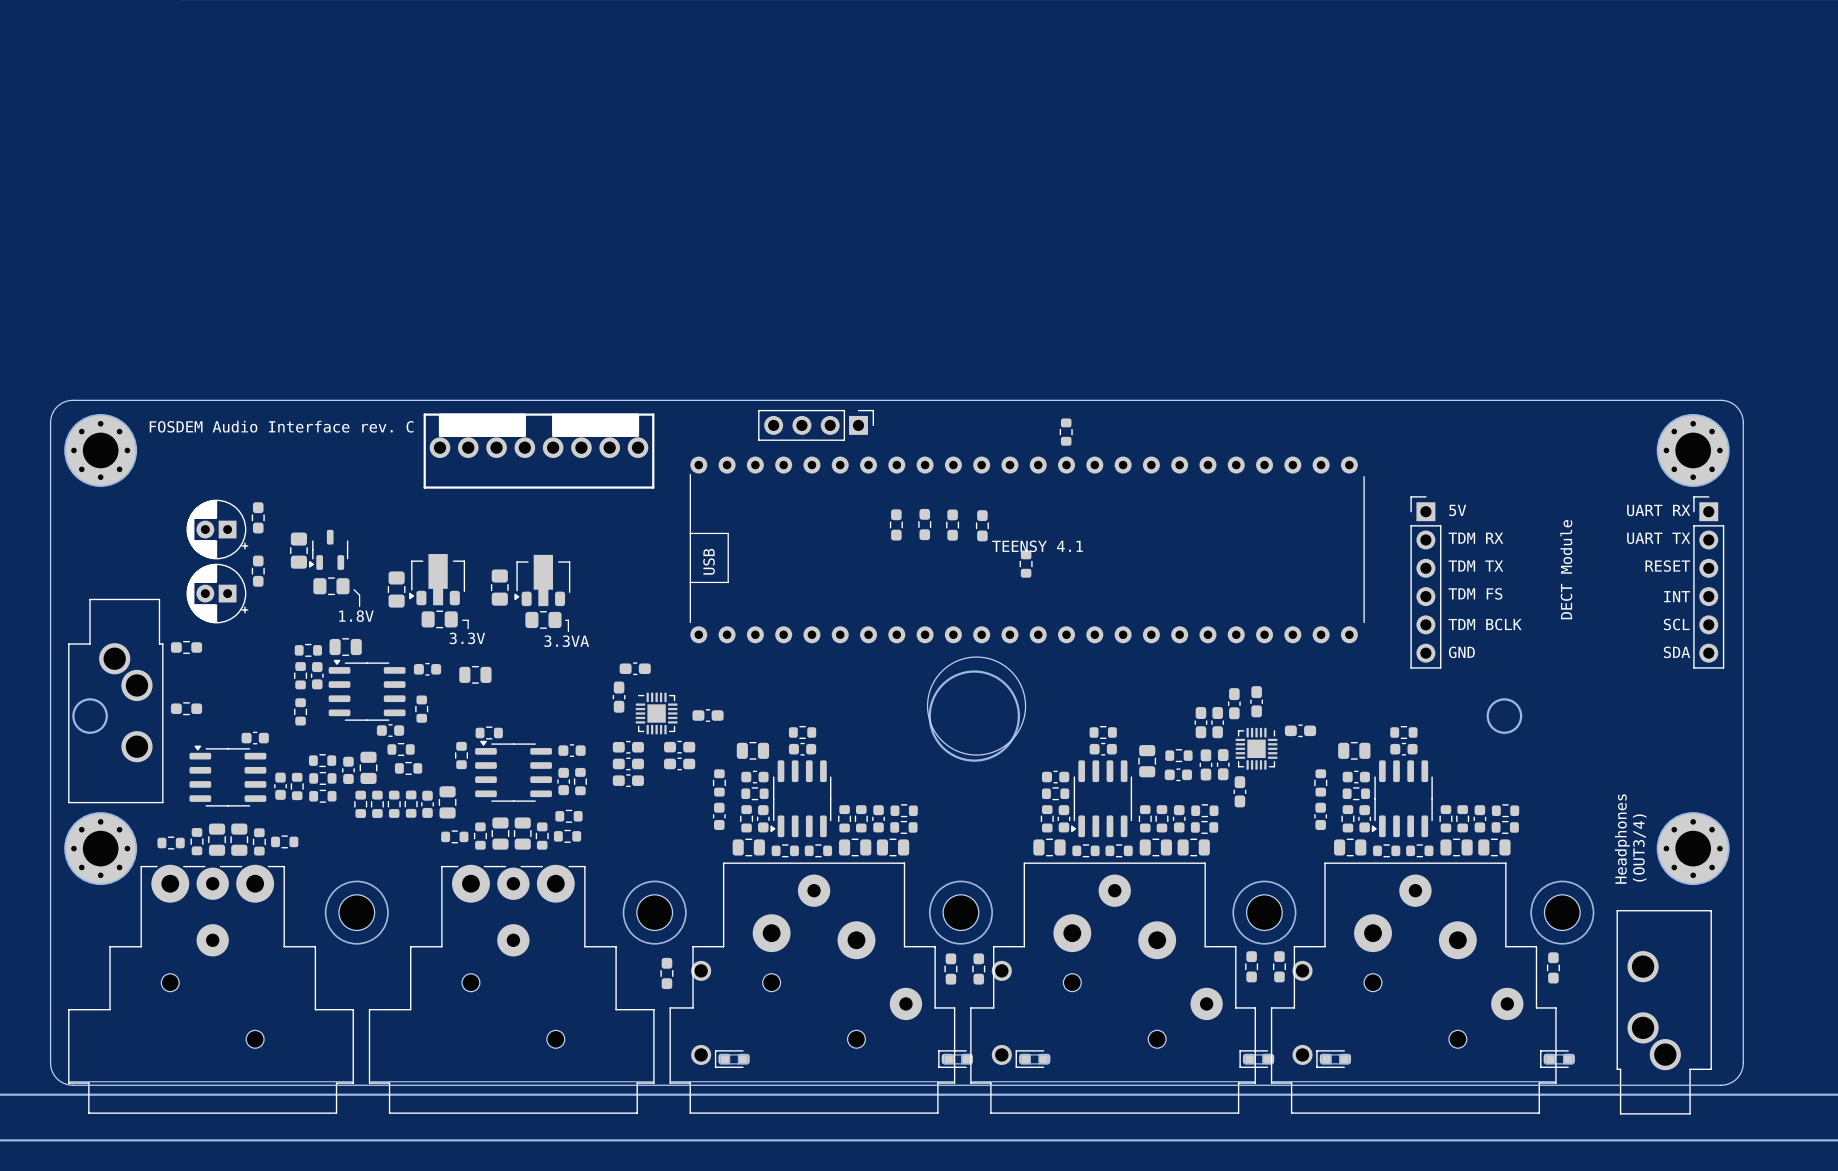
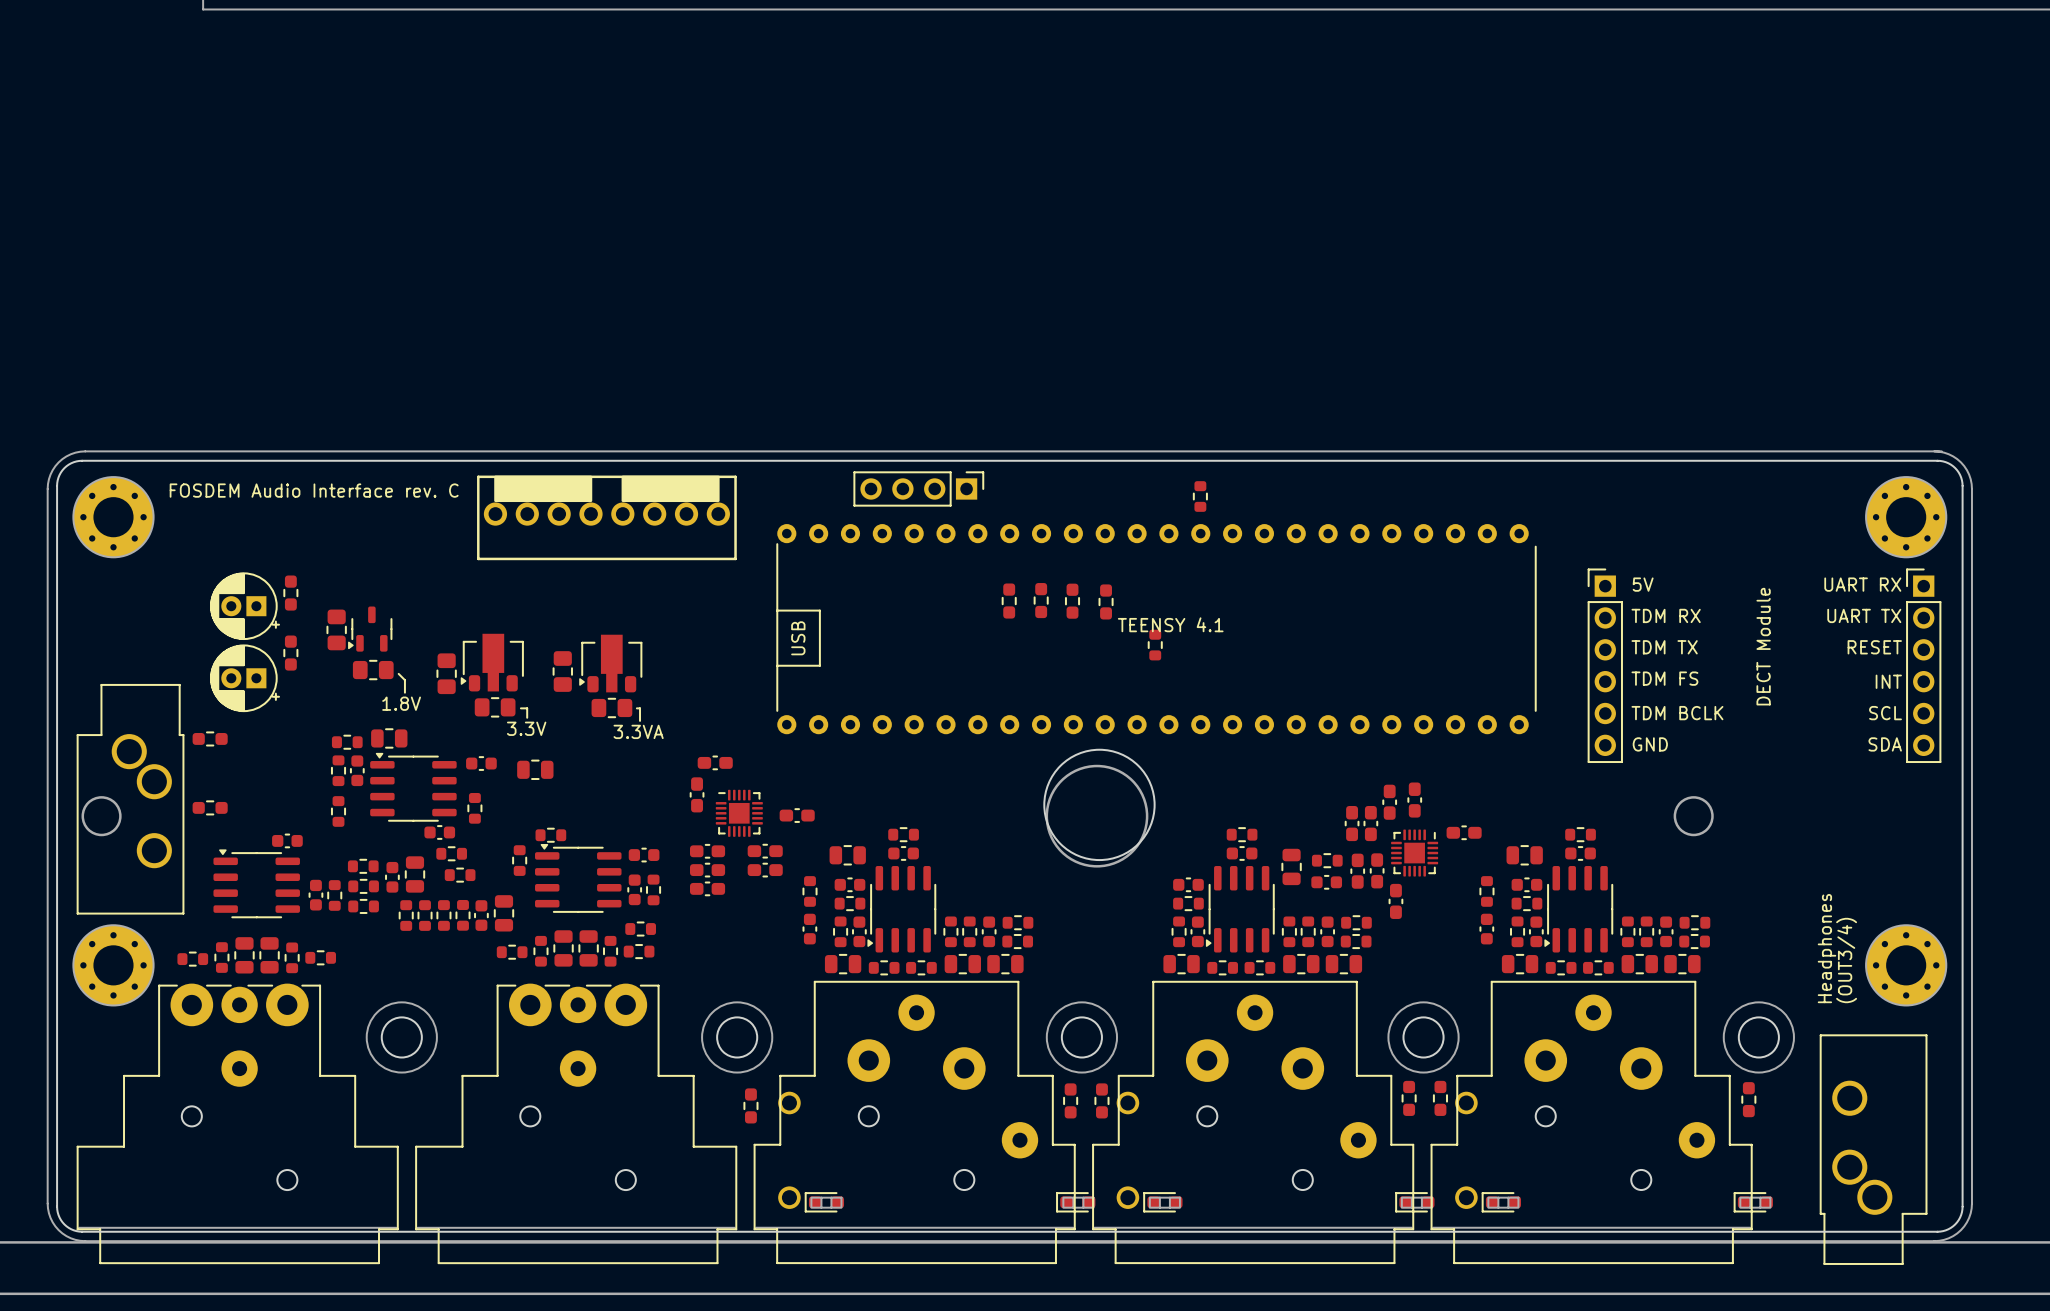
line: none -> (1934, 451) (1939, 451) (1948, 454) (1960, 462) (1969, 474) (1971, 488) (1971, 1203) (1966, 1222) (1960, 1230) (1948, 1238) (1934, 1241) (85, 1241) (66, 1236) (55, 1226) (50, 1217) (47, 1203) (47, 488) (50, 474) (55, 466) (70, 454) (85, 451) (1941, 451)

